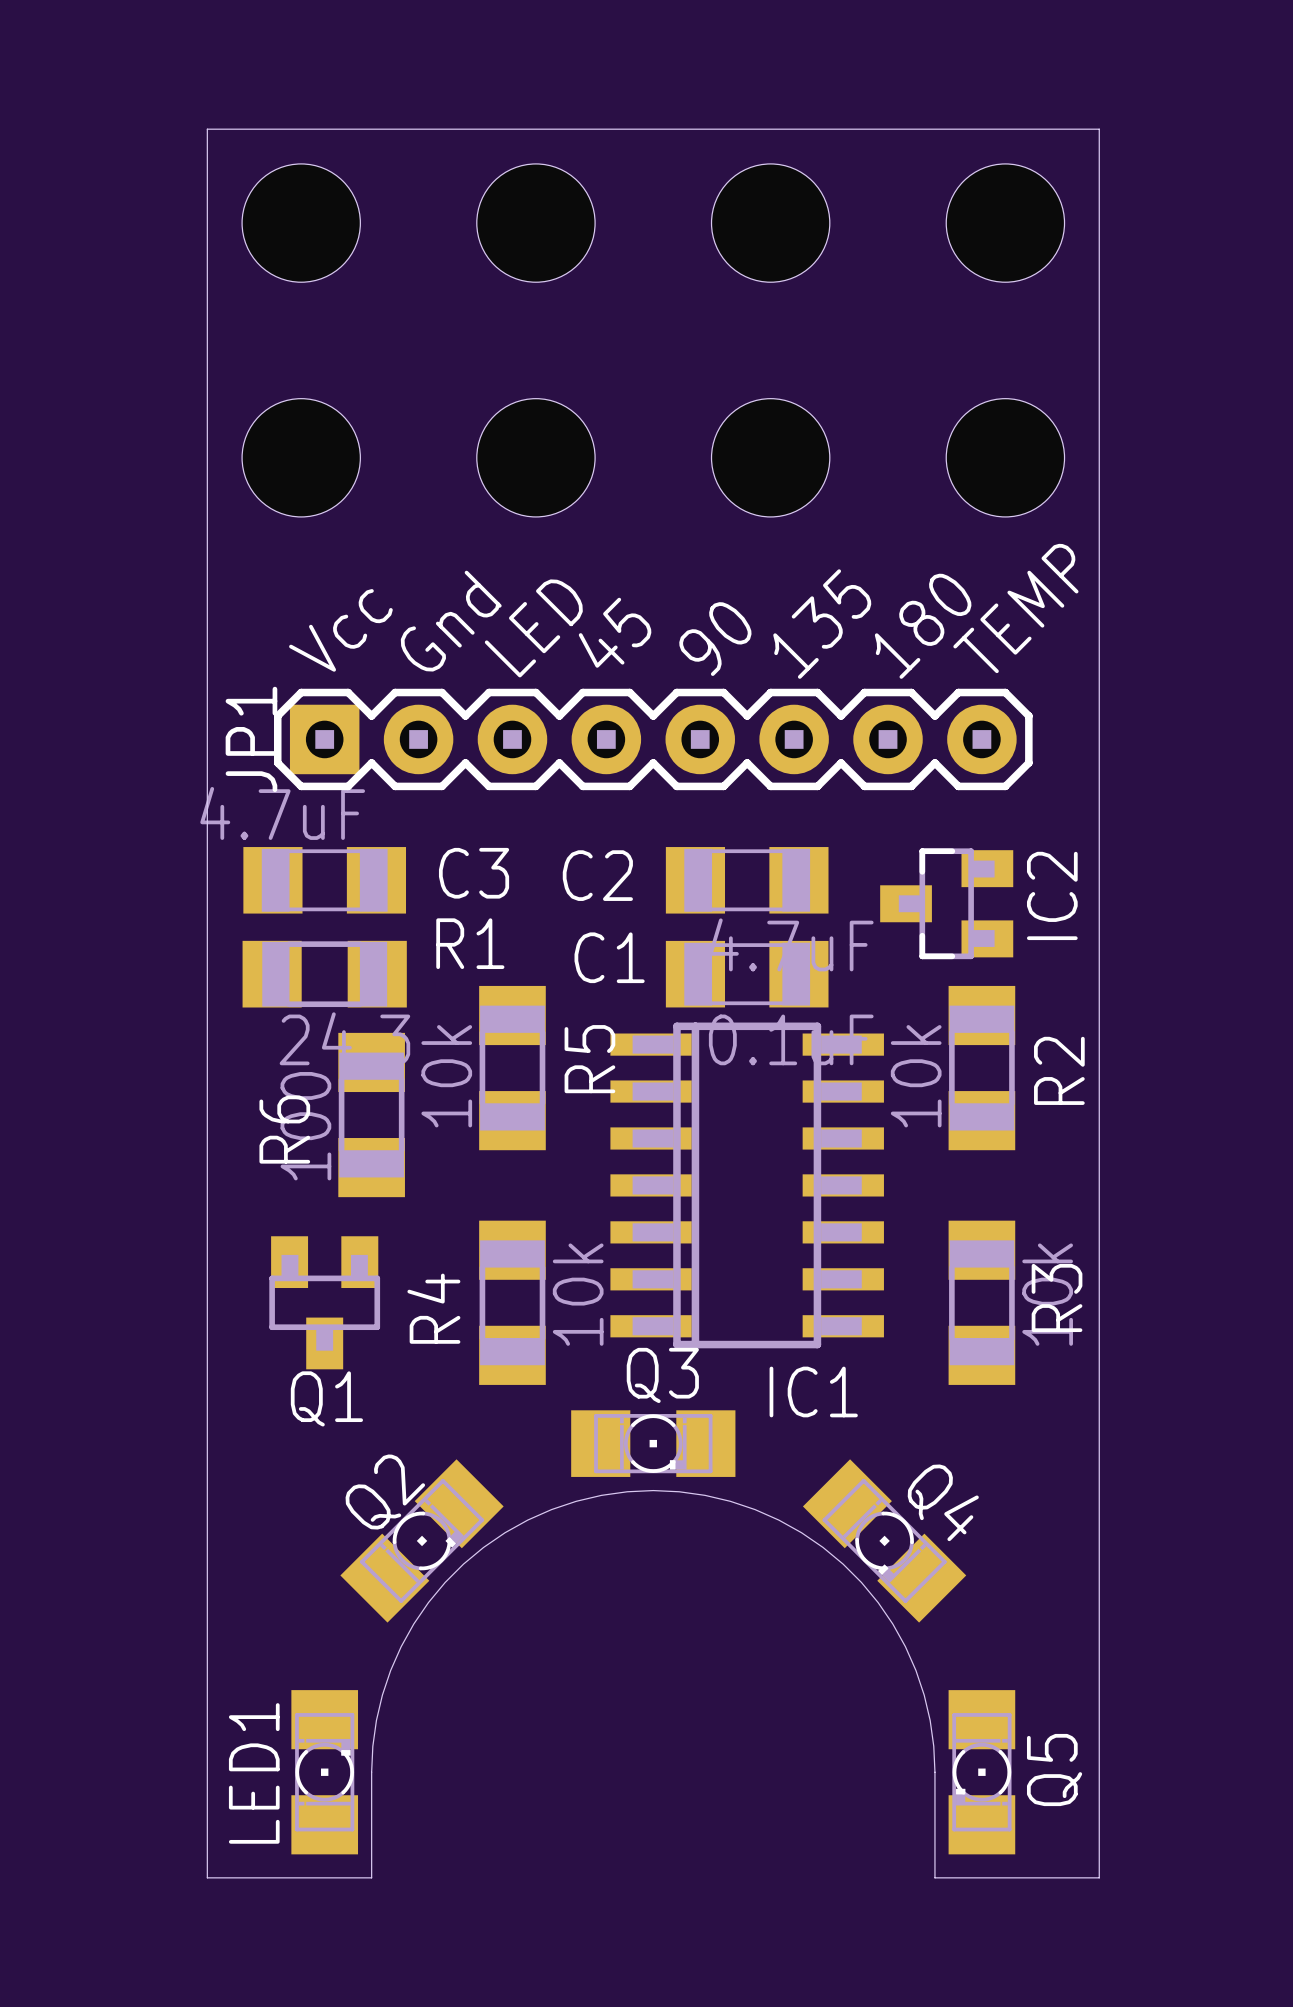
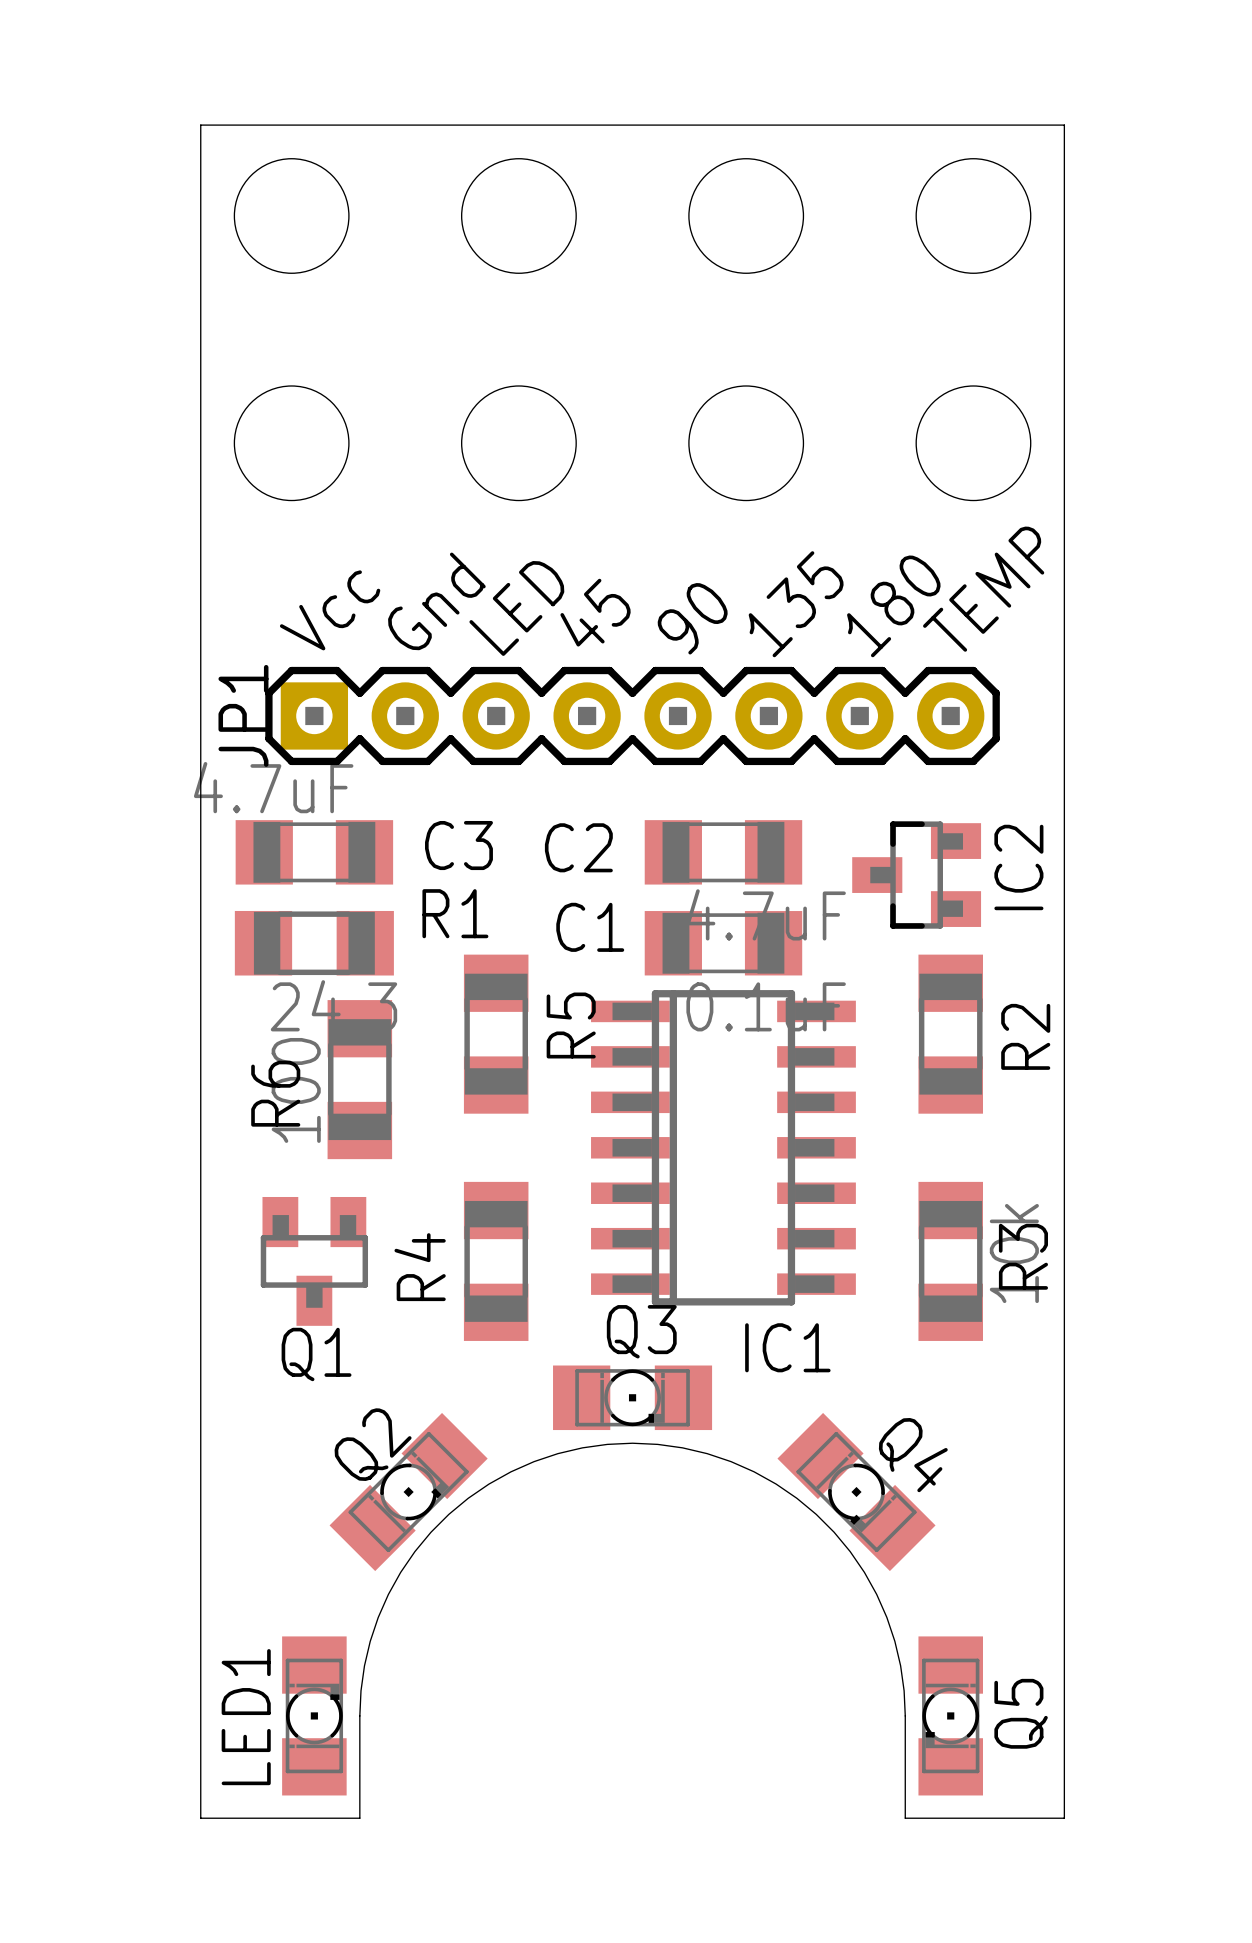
R5 value: 10k (446, 1076) -> none
R2 value: 10k (916, 1076) -> none
R4 value: 10k (578, 1294) -> none

